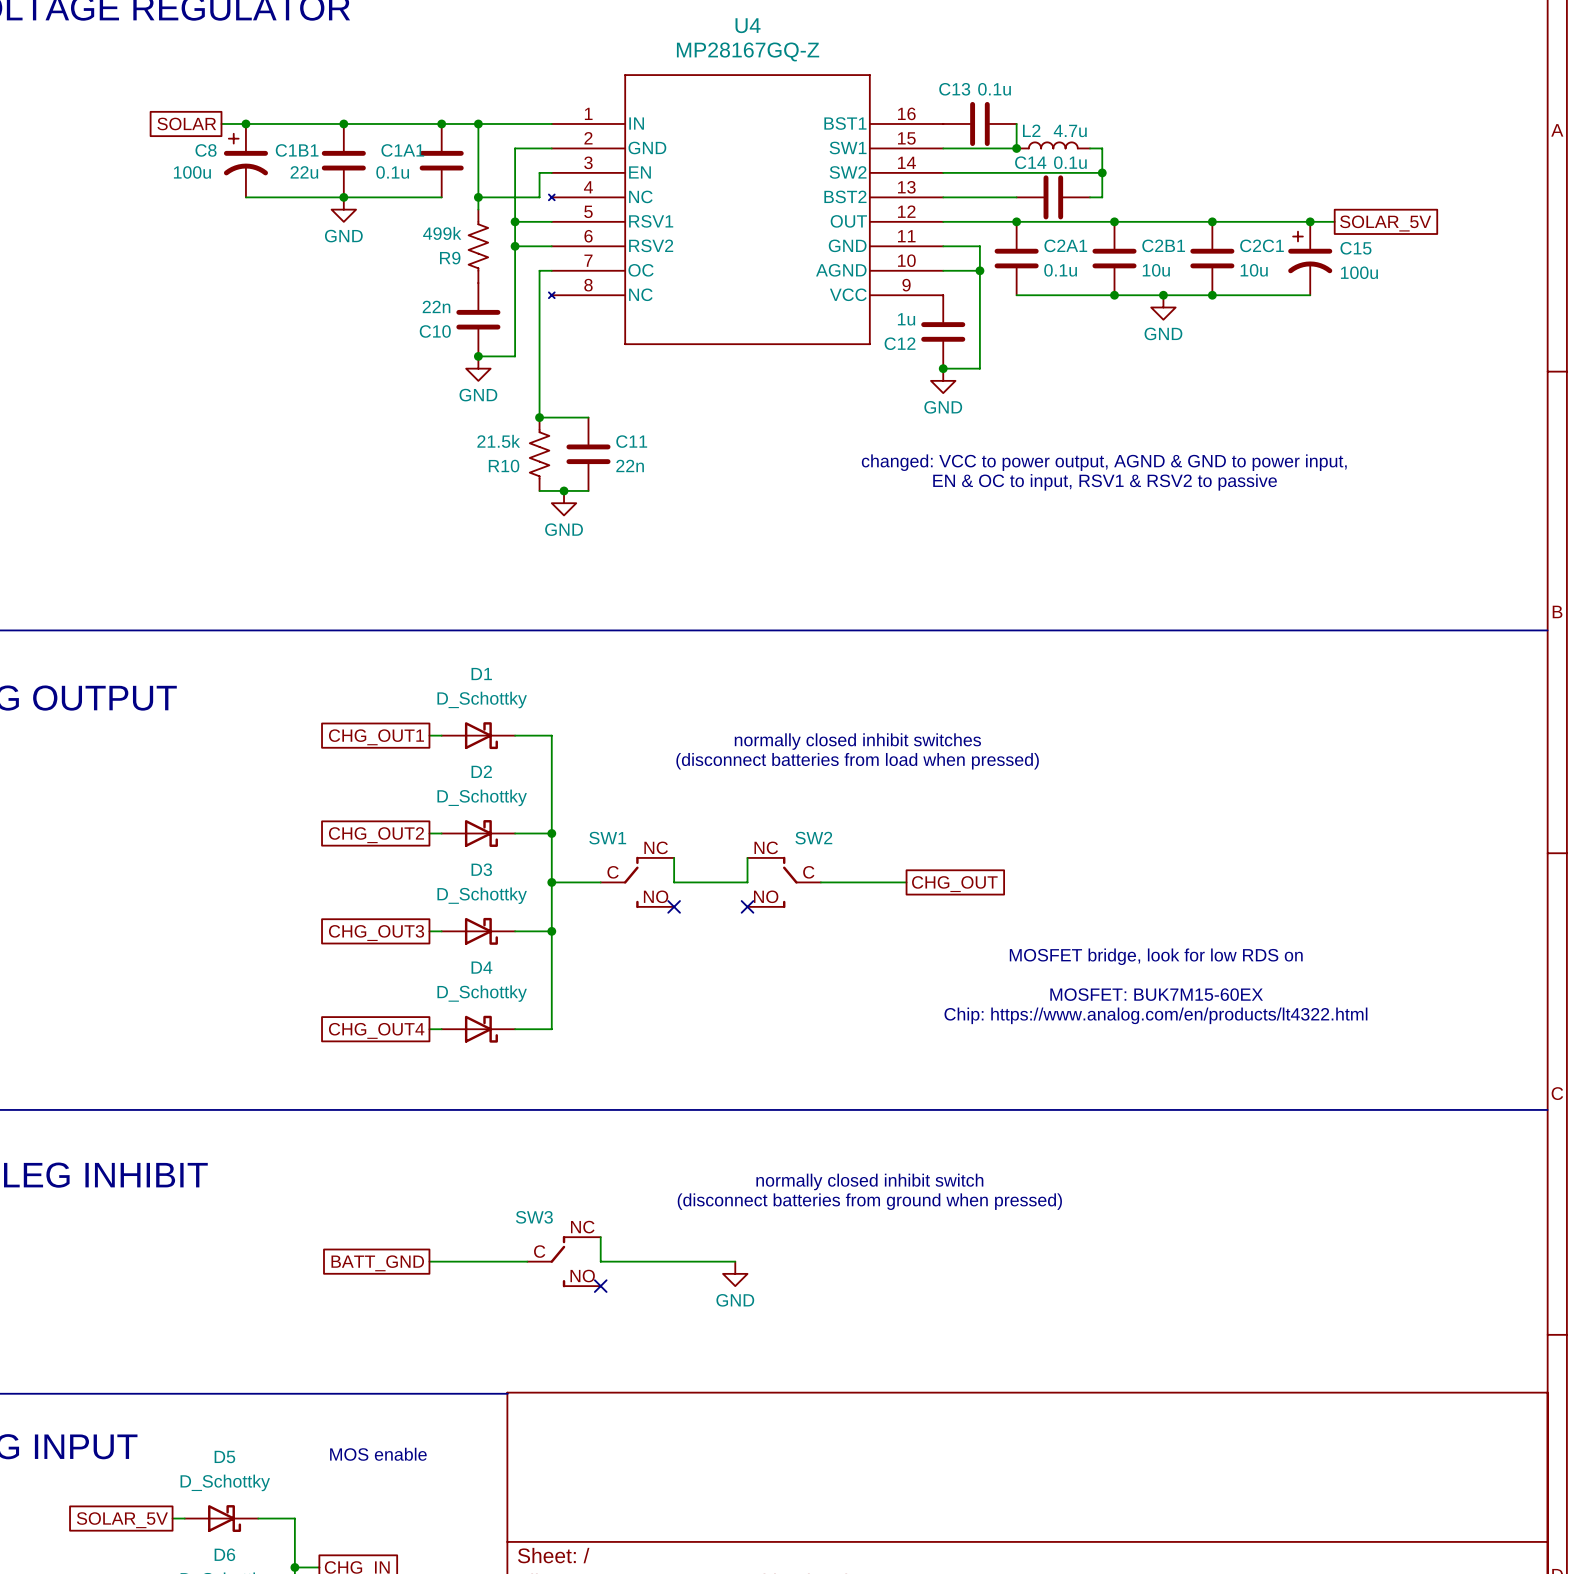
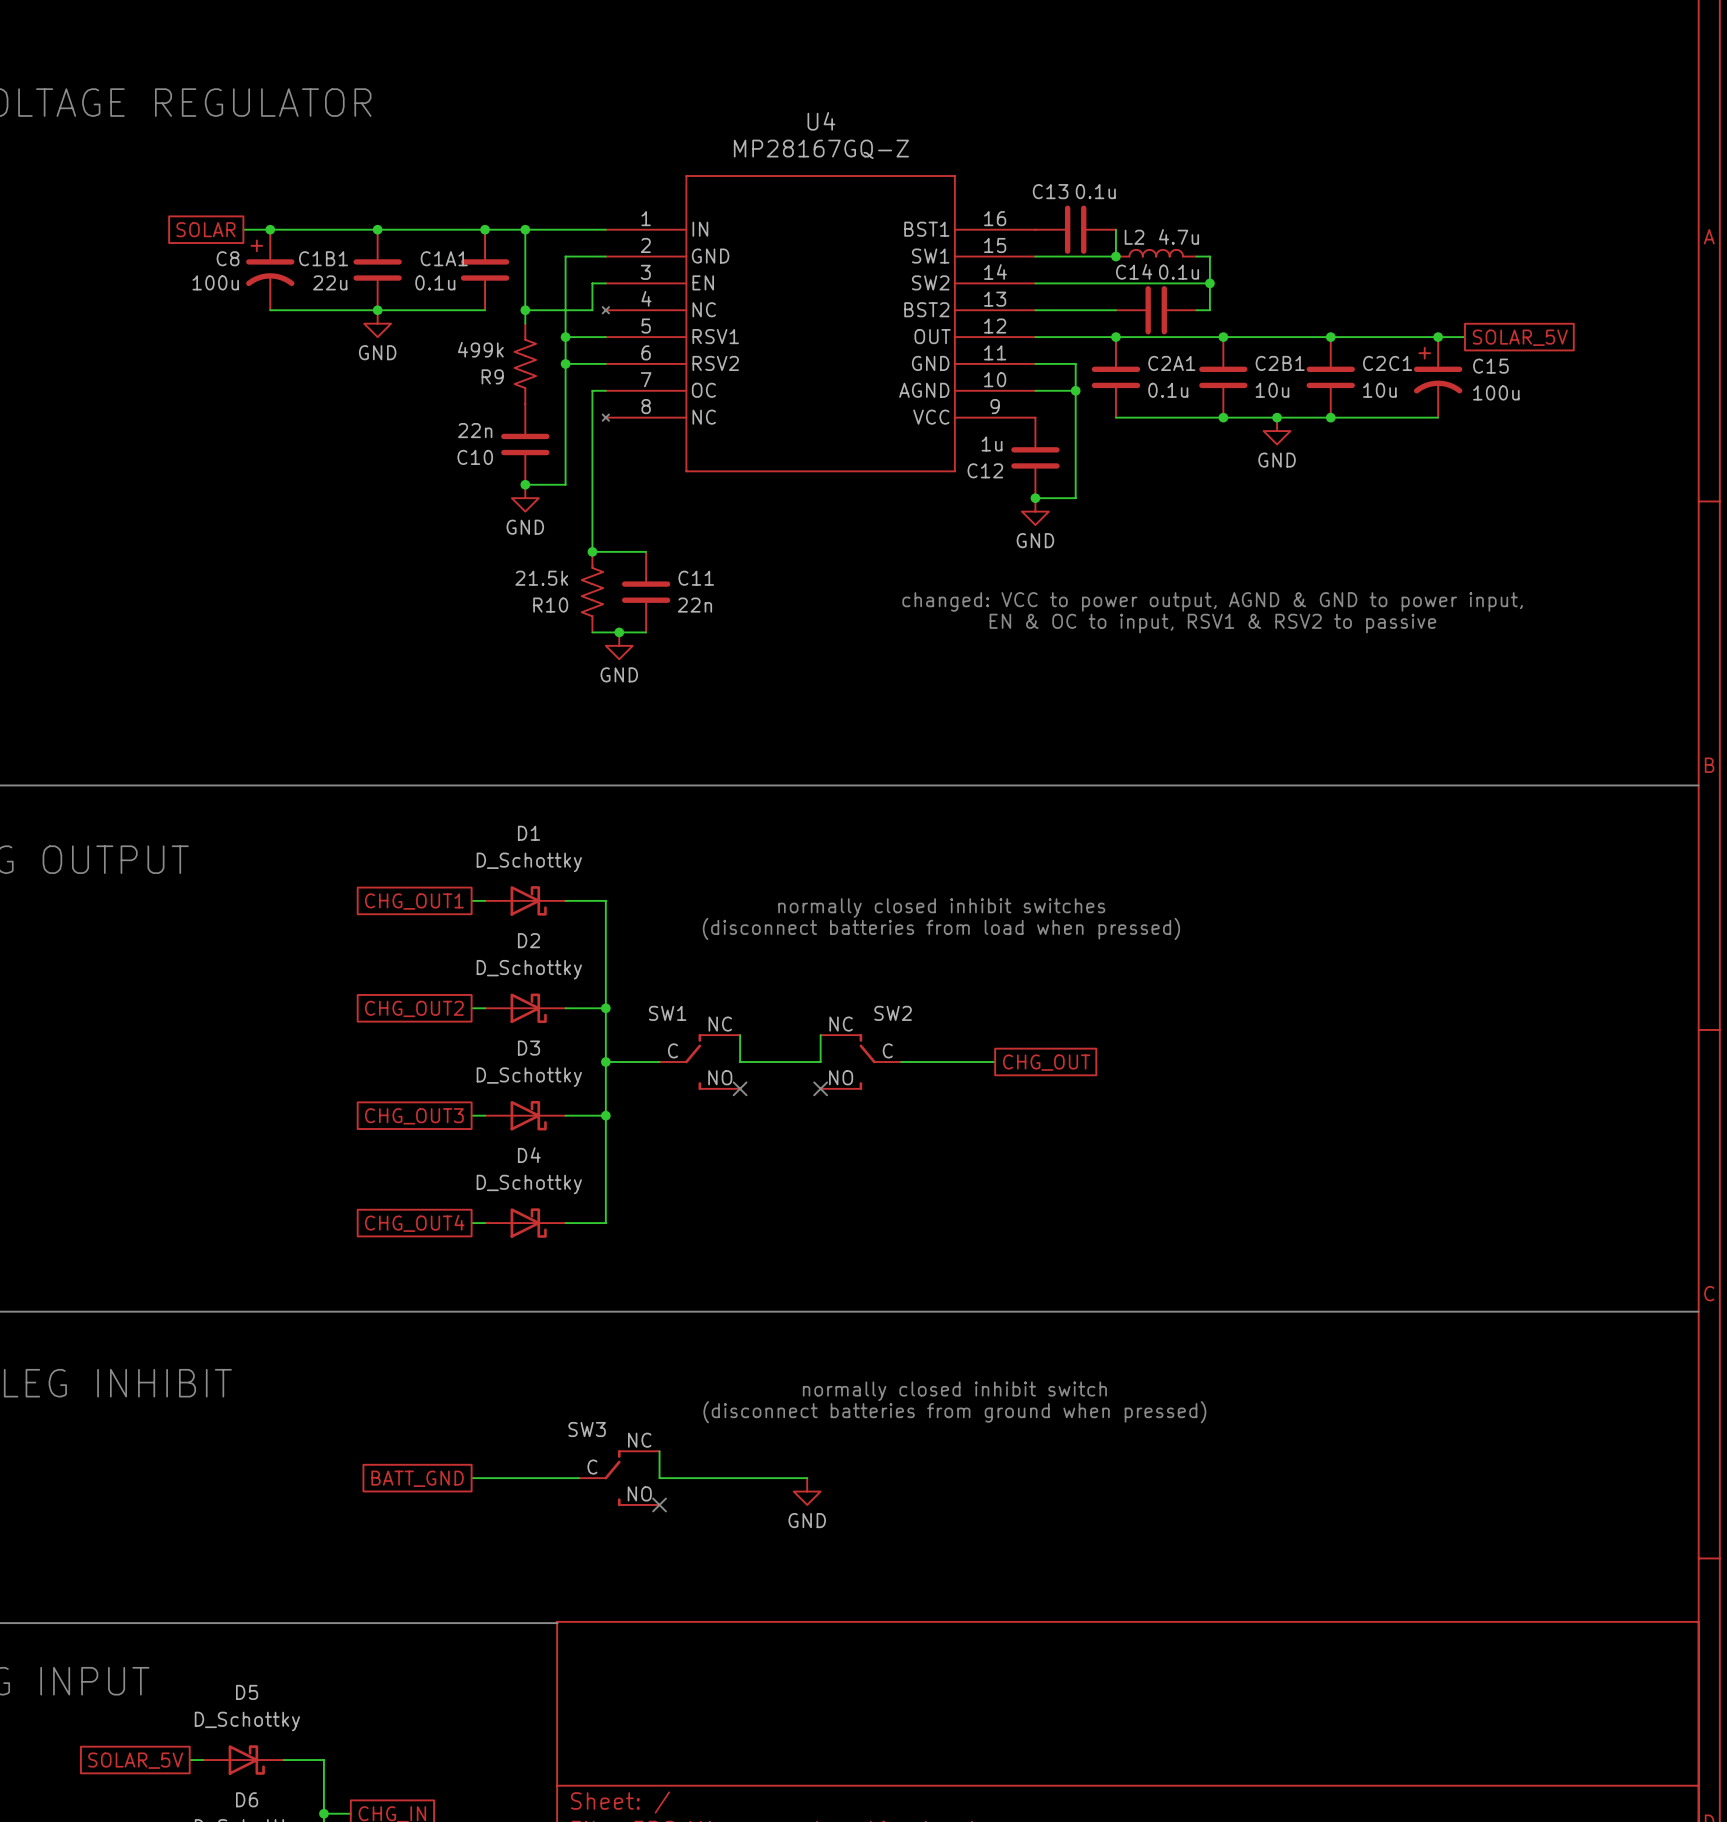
text: MOSFET bridge, look for low RDS on (1156, 956) -> none
text: MOSFET: BUK7M15-60EX (1156, 994) -> none
text: Chip: https://www.analog.com/en/products/lt4322.html (1155, 1015) -> none
text: MOS enable (378, 1454) -> none

